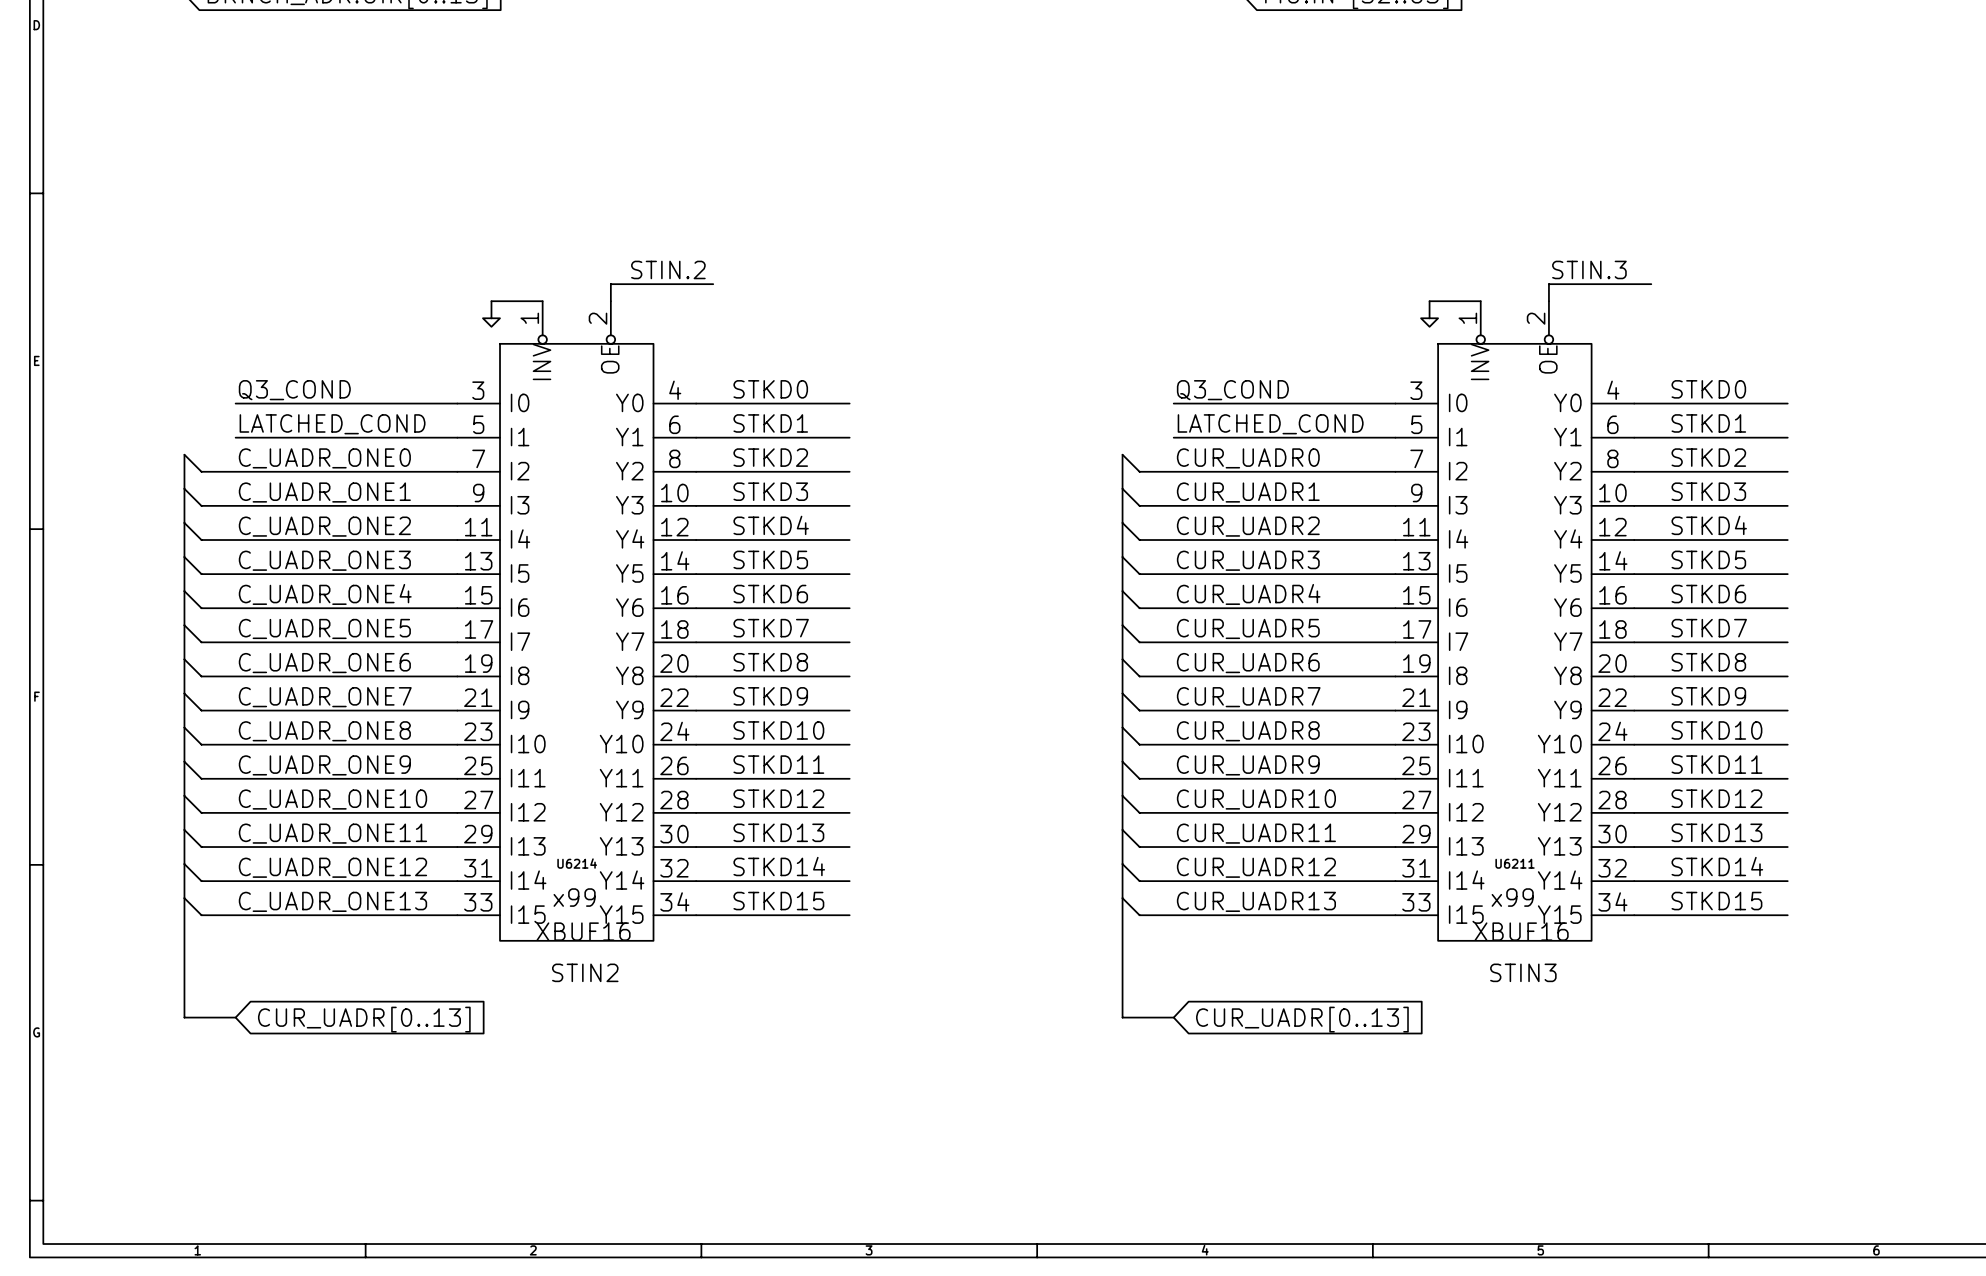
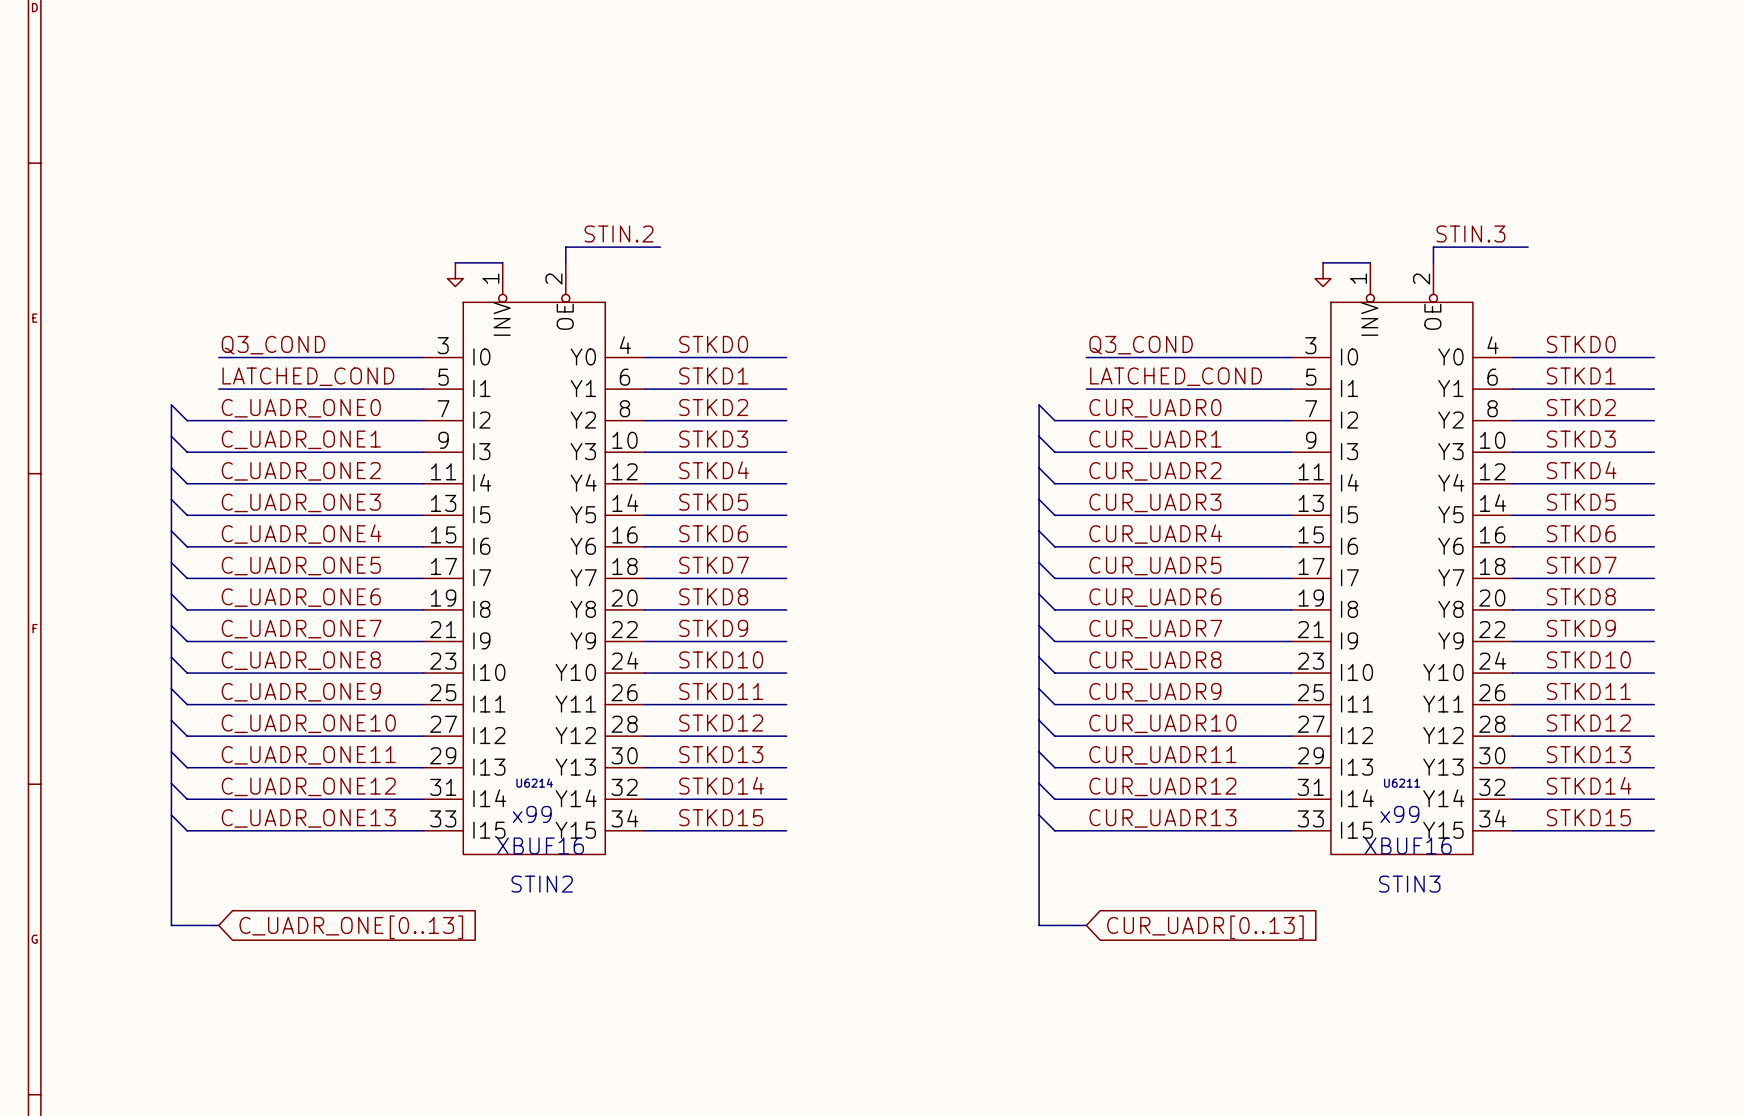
global label: CUR_UADR[0..13] (364, 1019) -> C_UADR_ONE[0..13] (351, 927)

